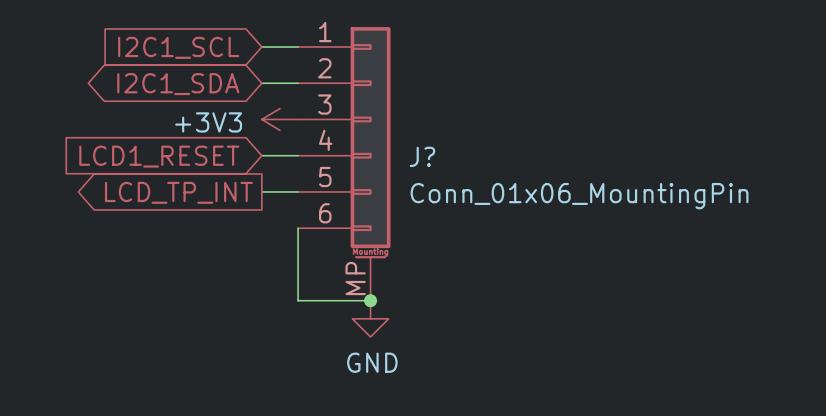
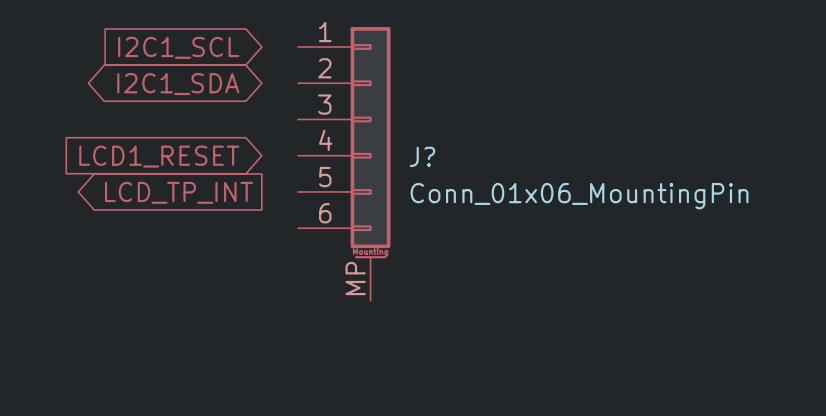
wire: (261, 46) (298, 46) -> none
wire: (261, 83) (298, 83) -> none
power symbol: +3V3 (279, 119) -> none
wire: (261, 155) (298, 155) -> none
wire: (261, 191) (298, 191) -> none
wire: (298, 228) (298, 300) (370, 300) -> none
junction: (370, 300) -> none
power symbol: GND (370, 318) -> none

